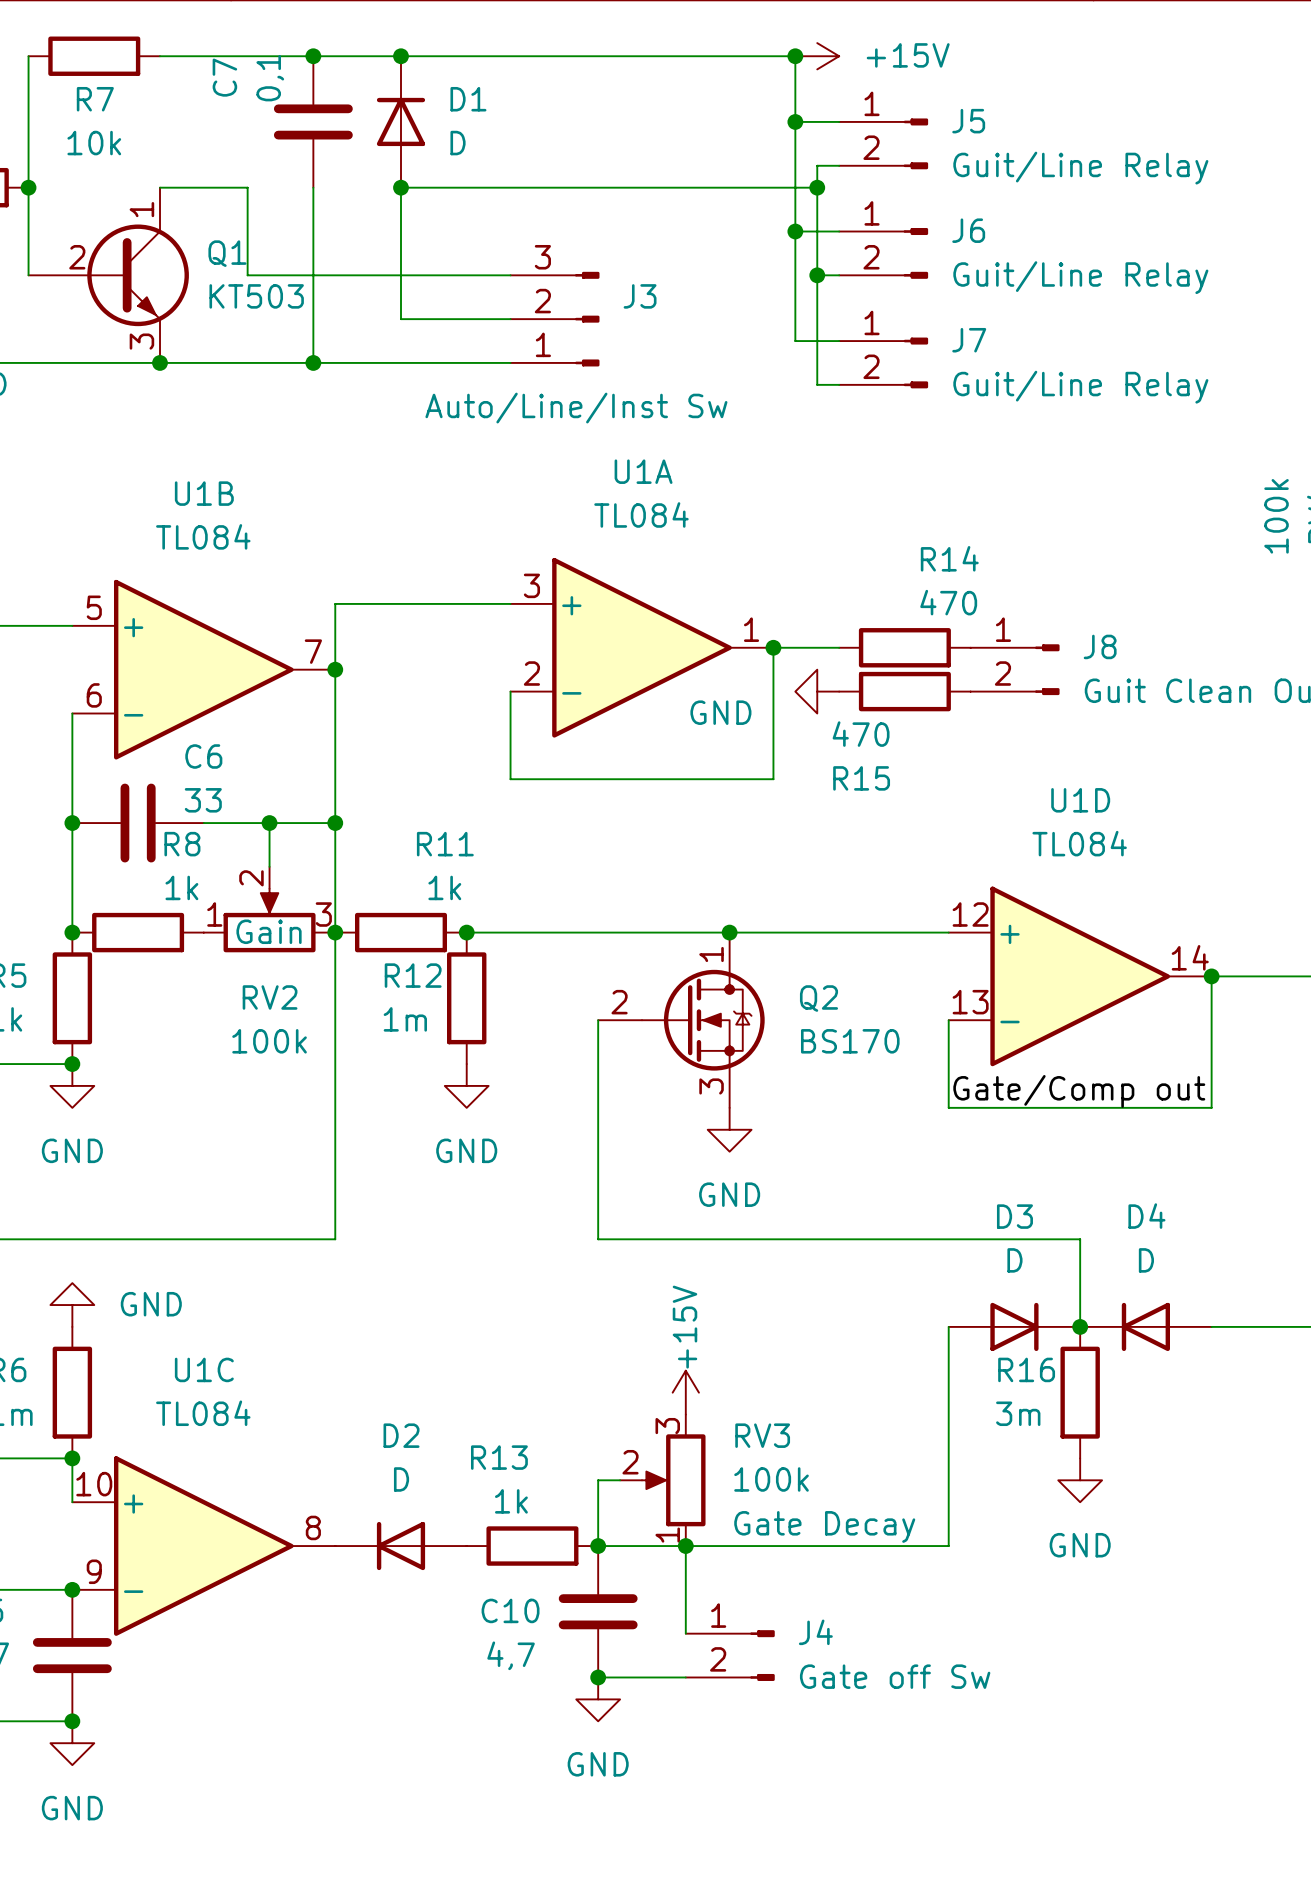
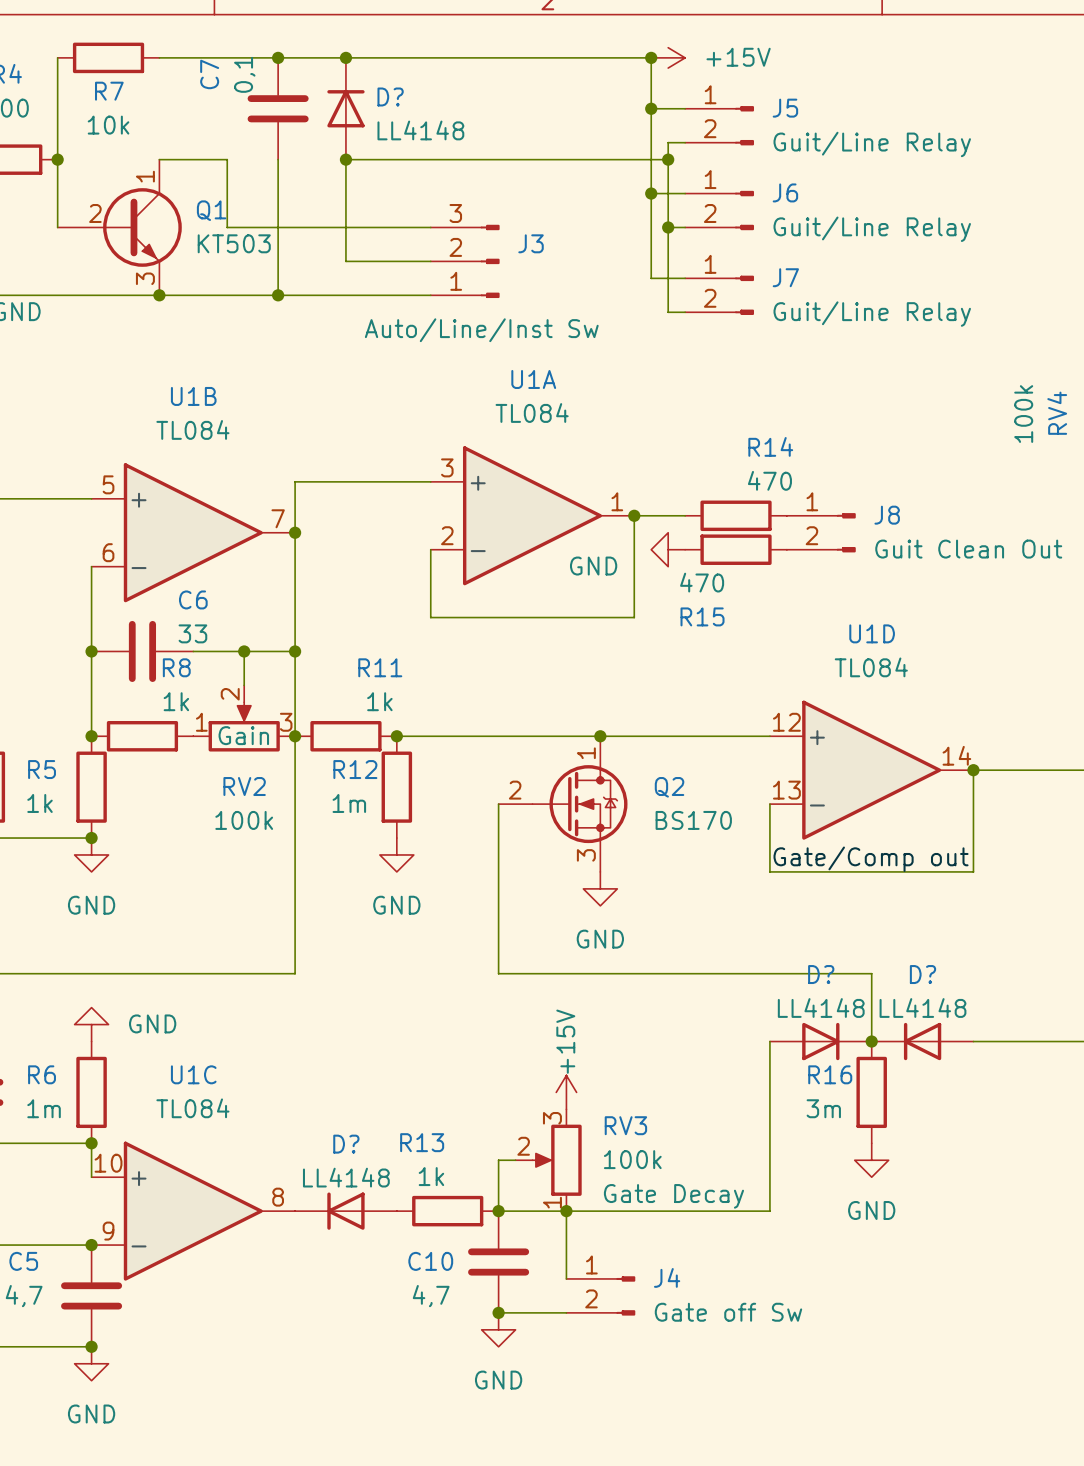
D1 name: D1 (468, 99) -> D? (390, 96)
D1 value: D (458, 143) -> LL4148 (420, 130)
D3 name: D3 (1014, 1216) -> D? (821, 974)
D4 name: D4 (1146, 1216) -> D? (922, 974)
D3 value: D (1014, 1260) -> LL4148 (821, 1008)
D4 value: D (1146, 1260) -> LL4148 (922, 1008)
D2 name: D2 (401, 1435) -> D? (346, 1144)
D2 value: D (401, 1479) -> LL4148 (346, 1177)

